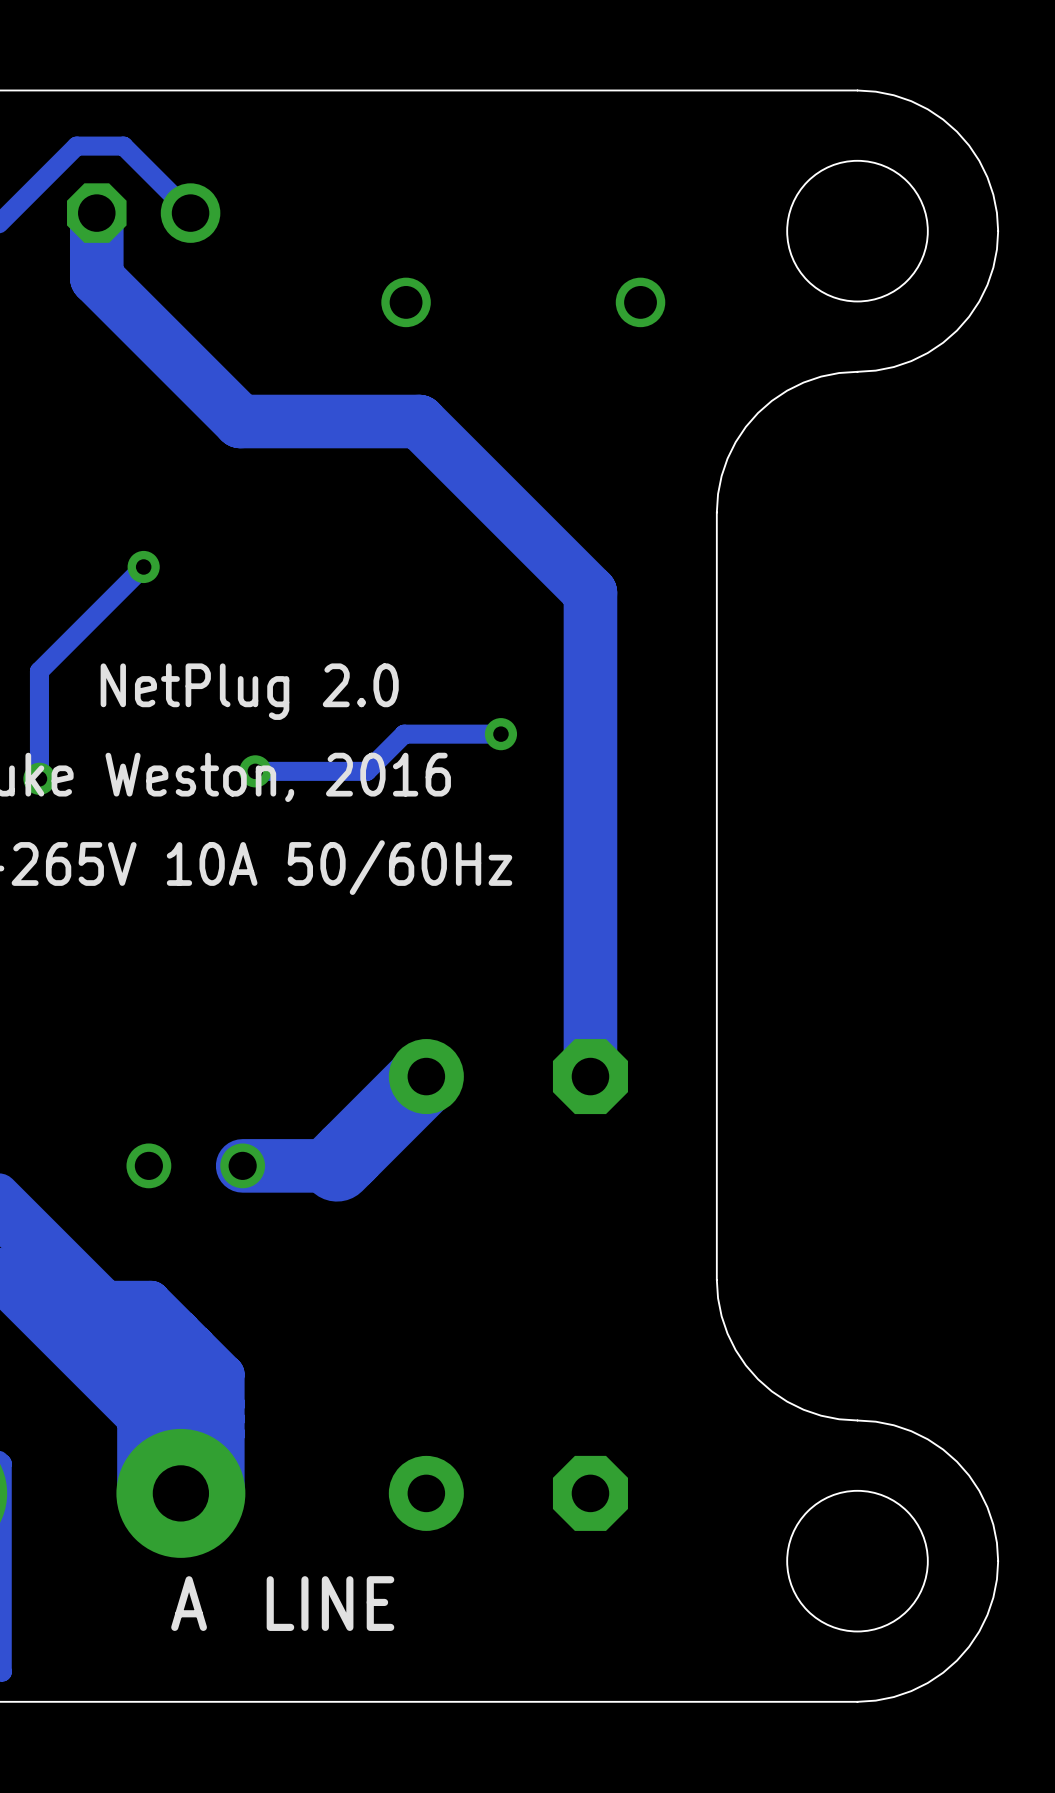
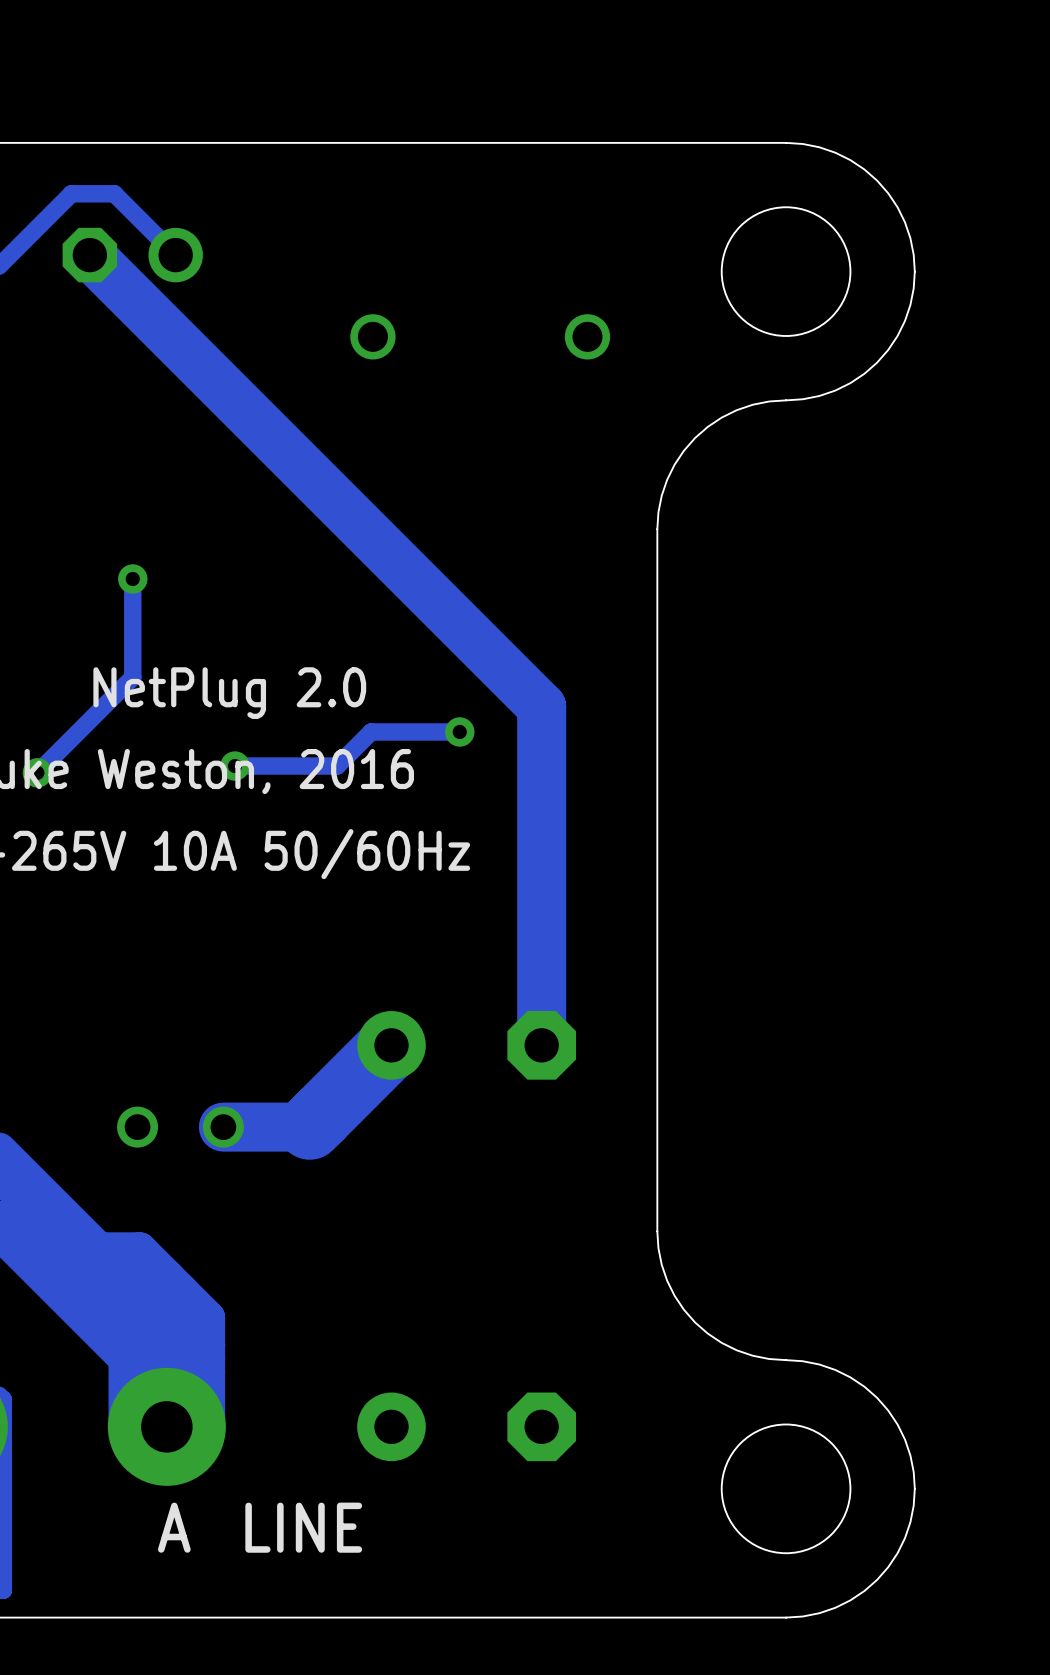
track: (96, 213) (96, 277) (240, 421) (419, 421) (590, 592) (590, 706) -> (89, 255) (541, 706)
track: (143, 566) (39, 671) (39, 778) -> (132, 578) (132, 677) (37, 772)

